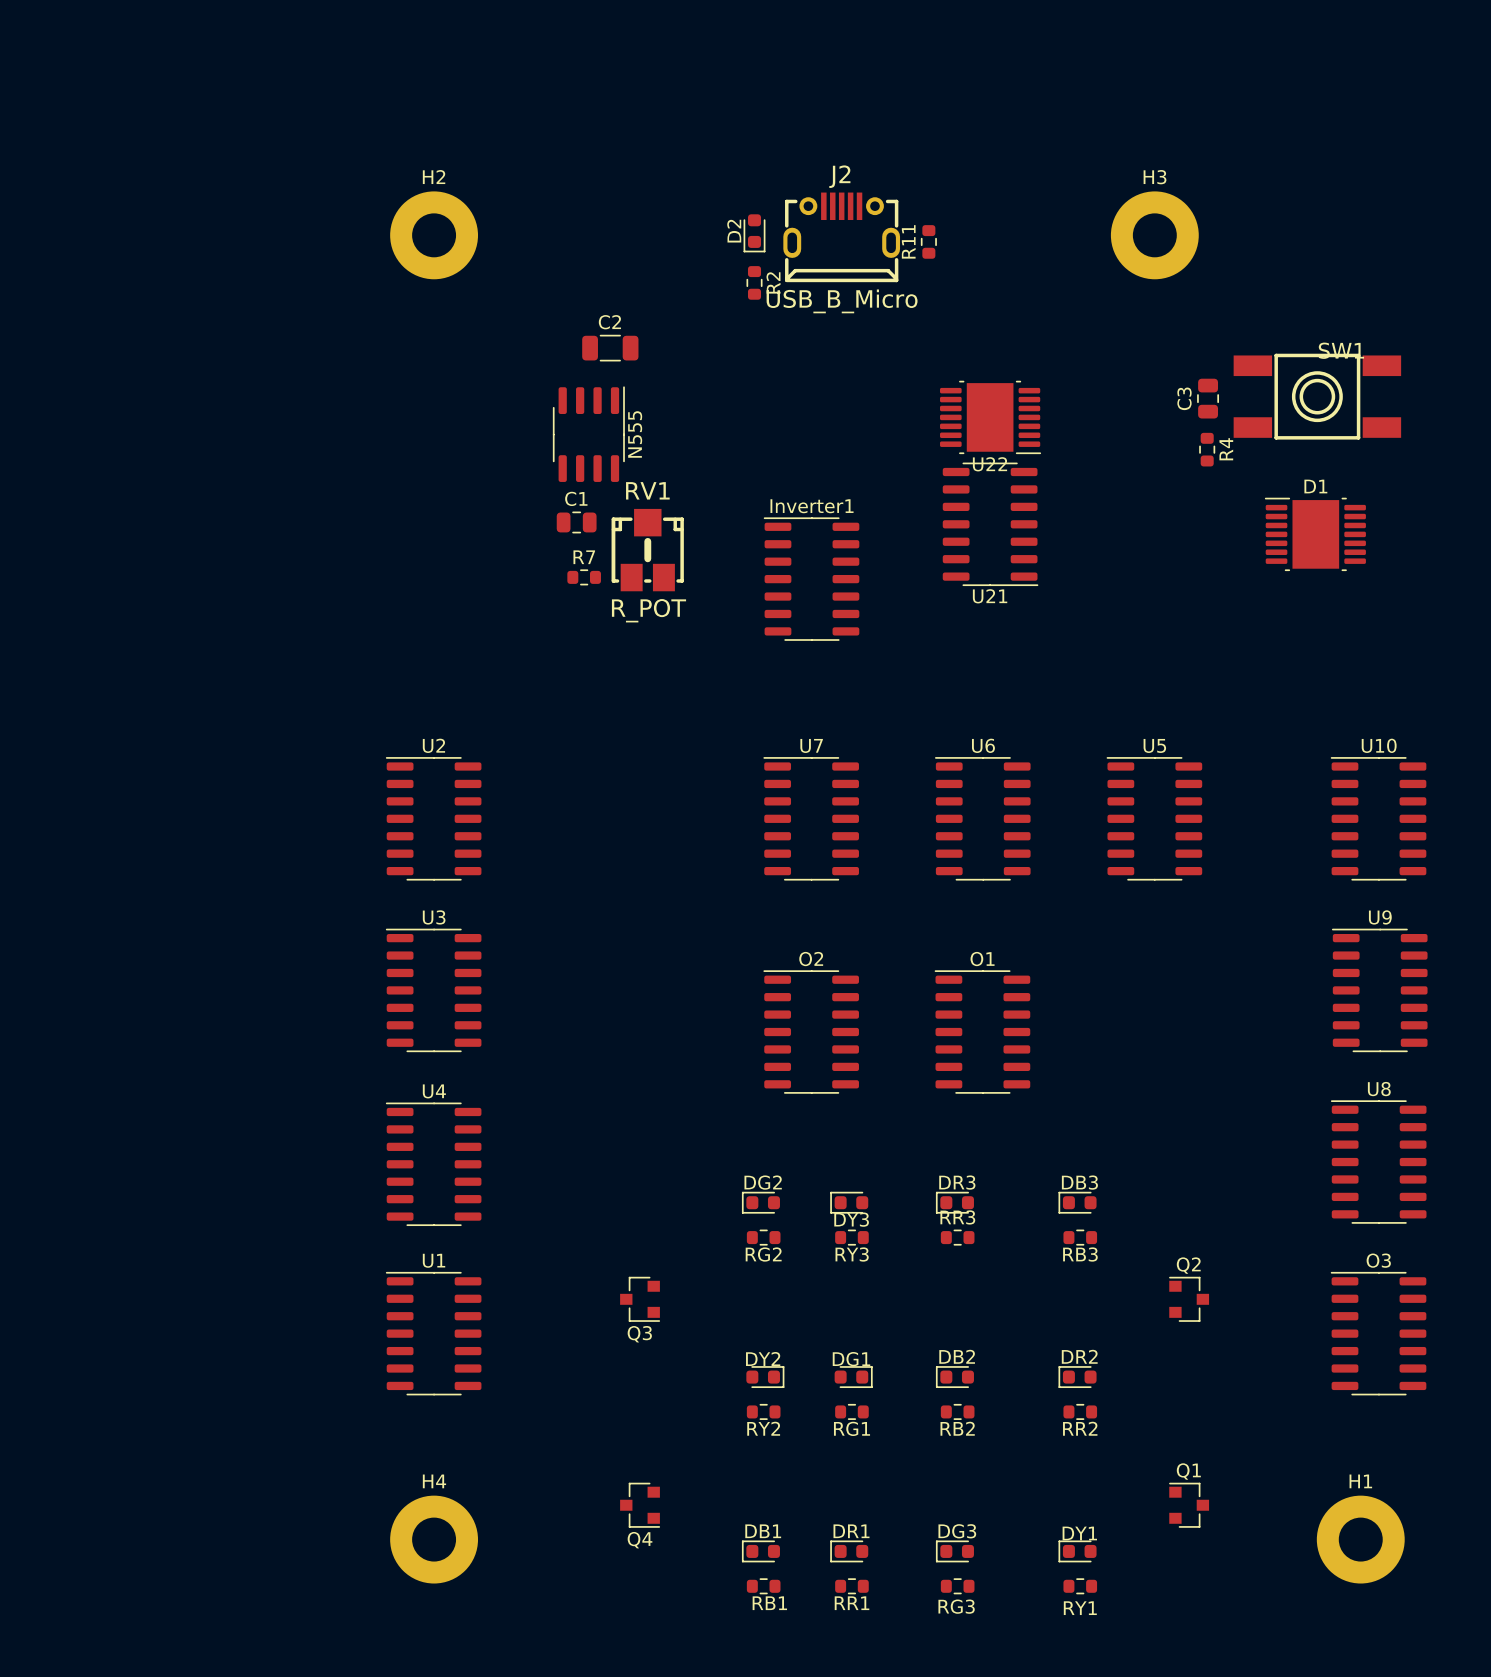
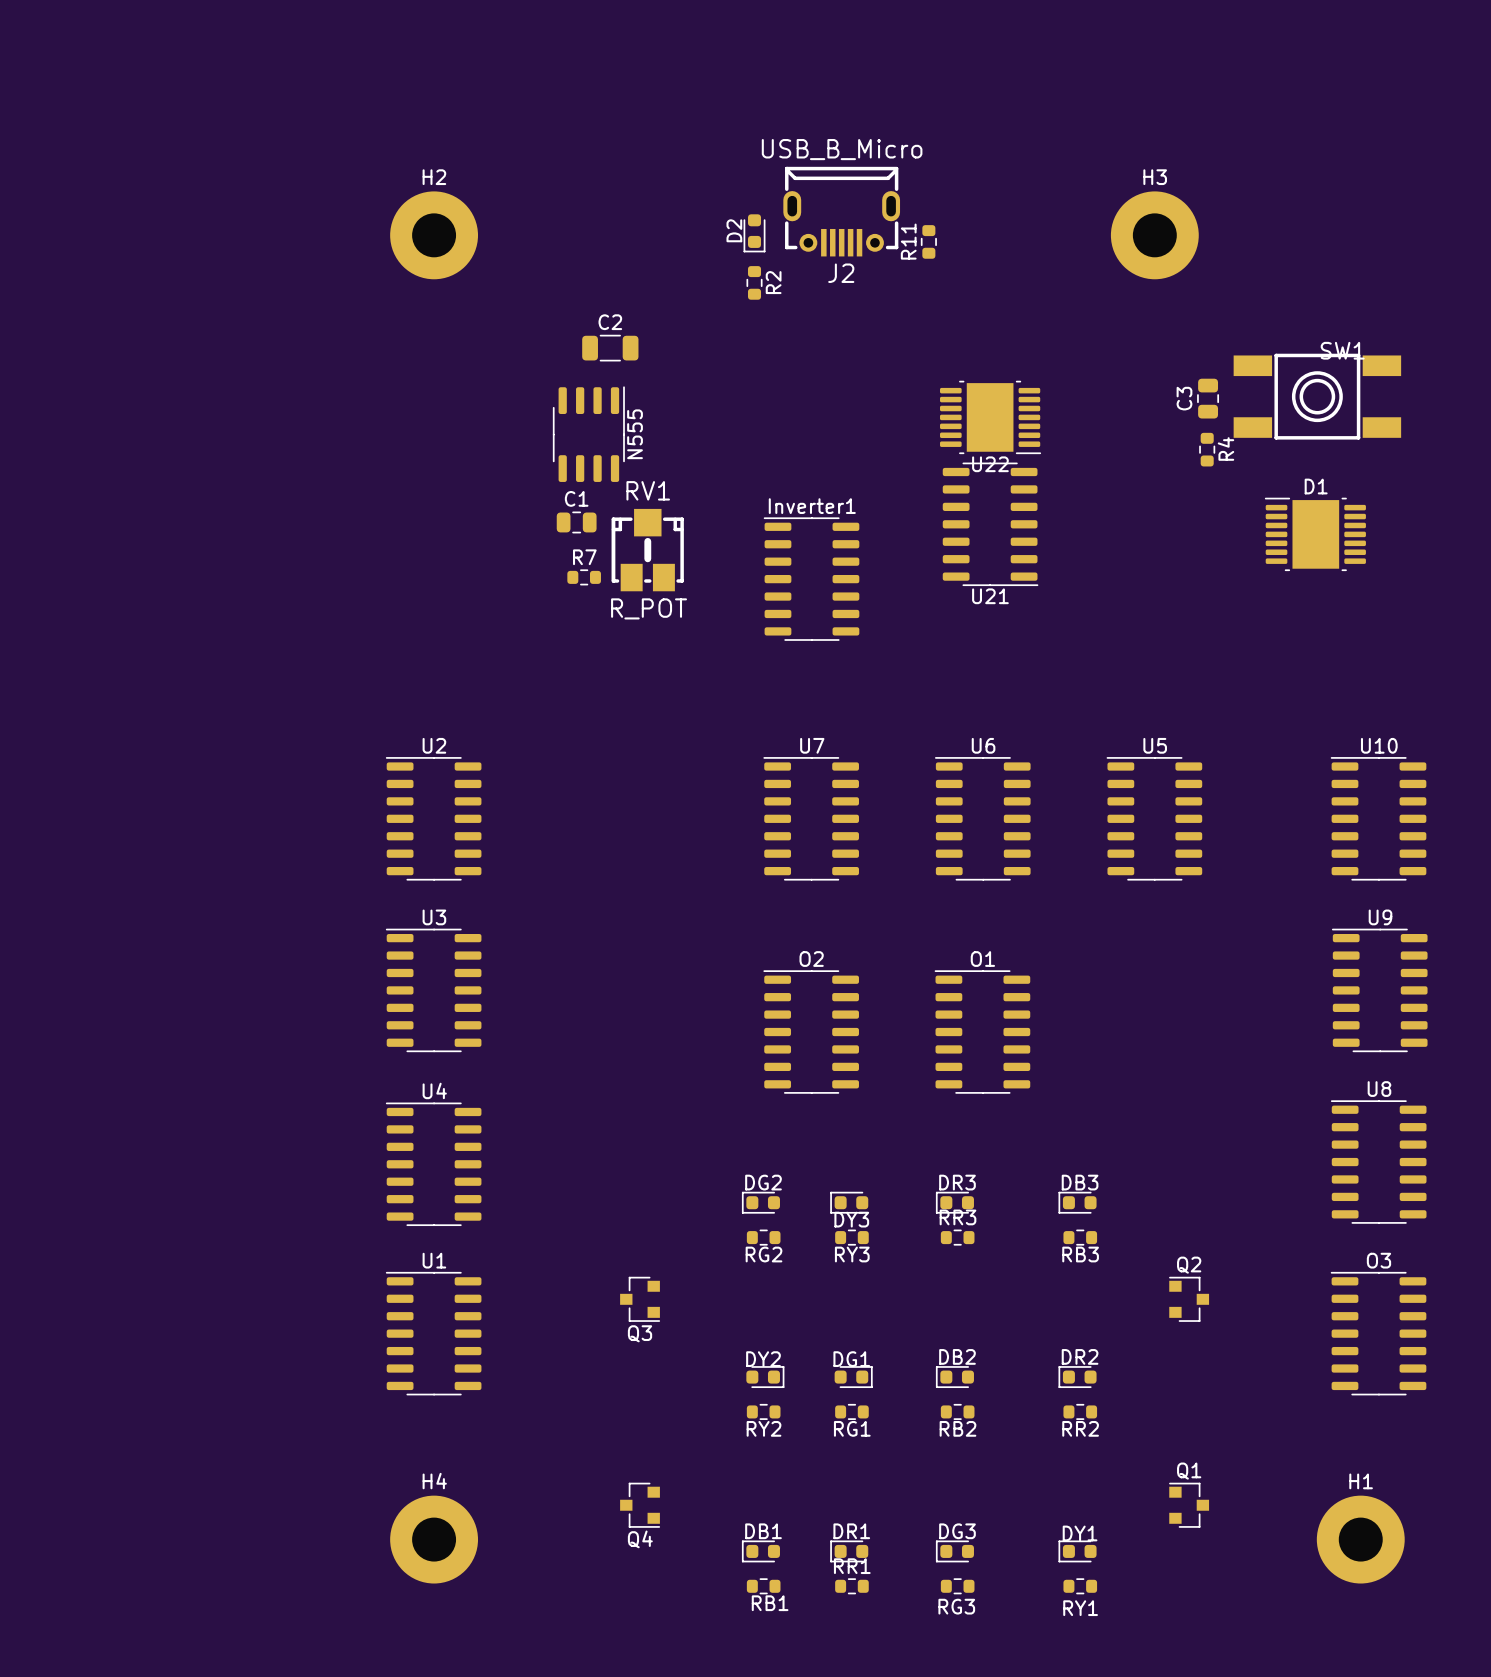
J2 rotation: 0° (841, 237) -> 180° (841, 211)
RR1 name position: RR1 (852, 1603) -> RR1 (852, 1566)

